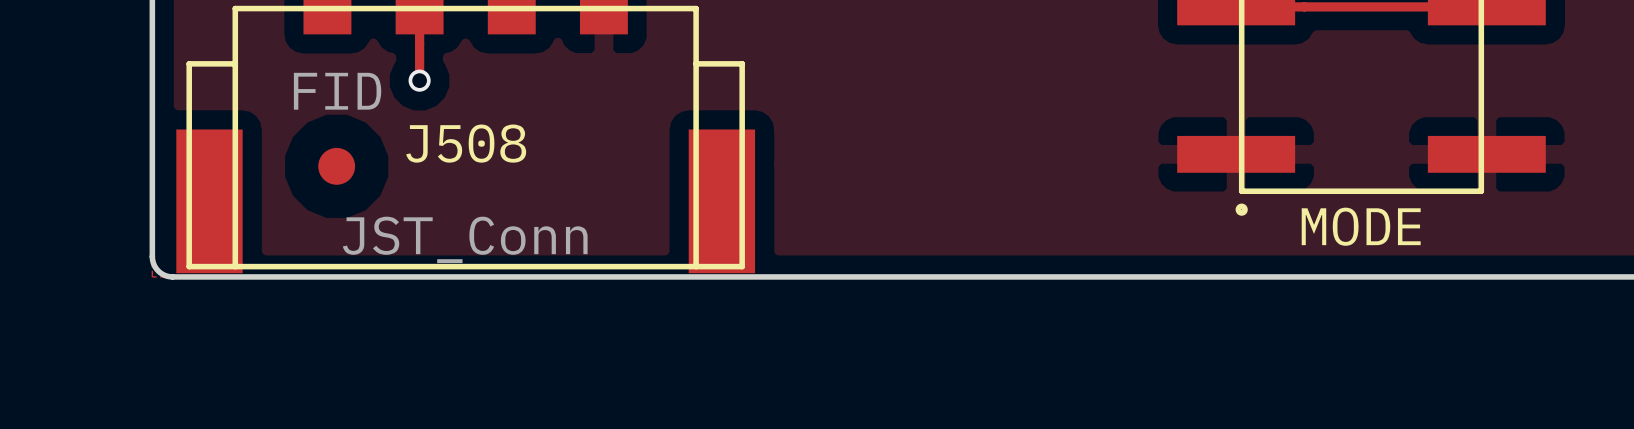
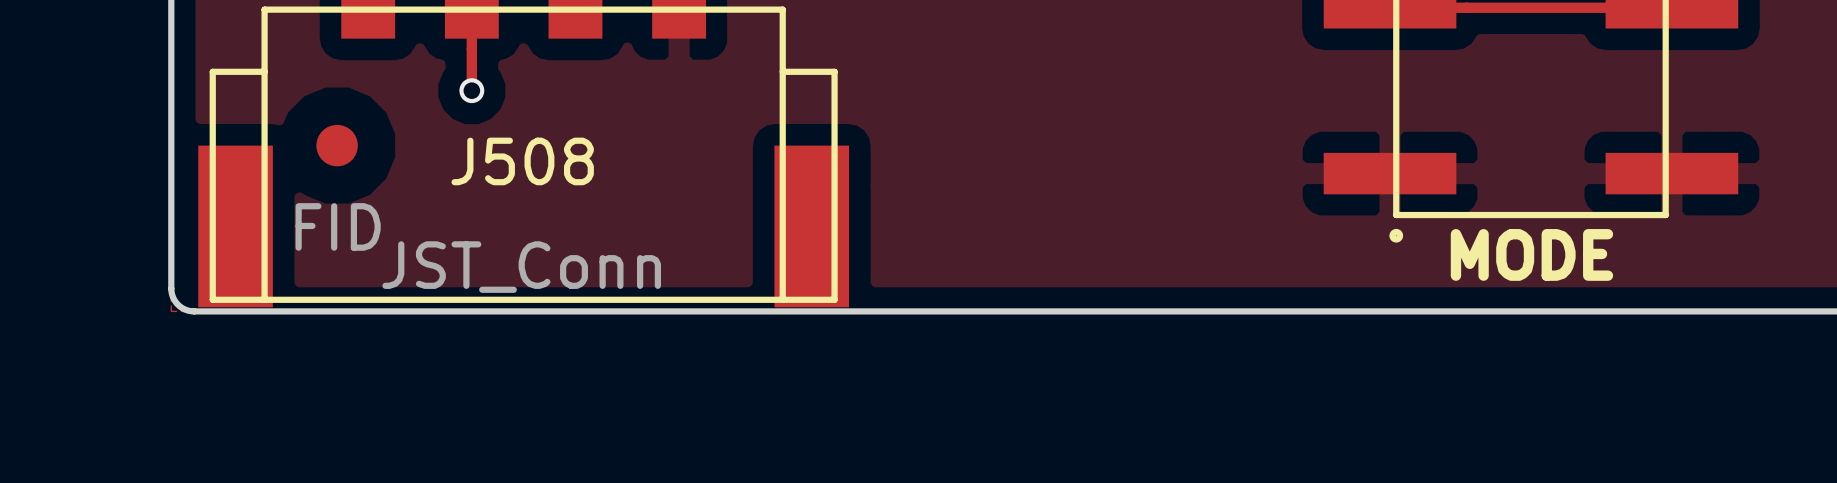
part value position: FID (337, 91) -> FID (338, 226)
part position: (336, 166) -> (337, 145)

